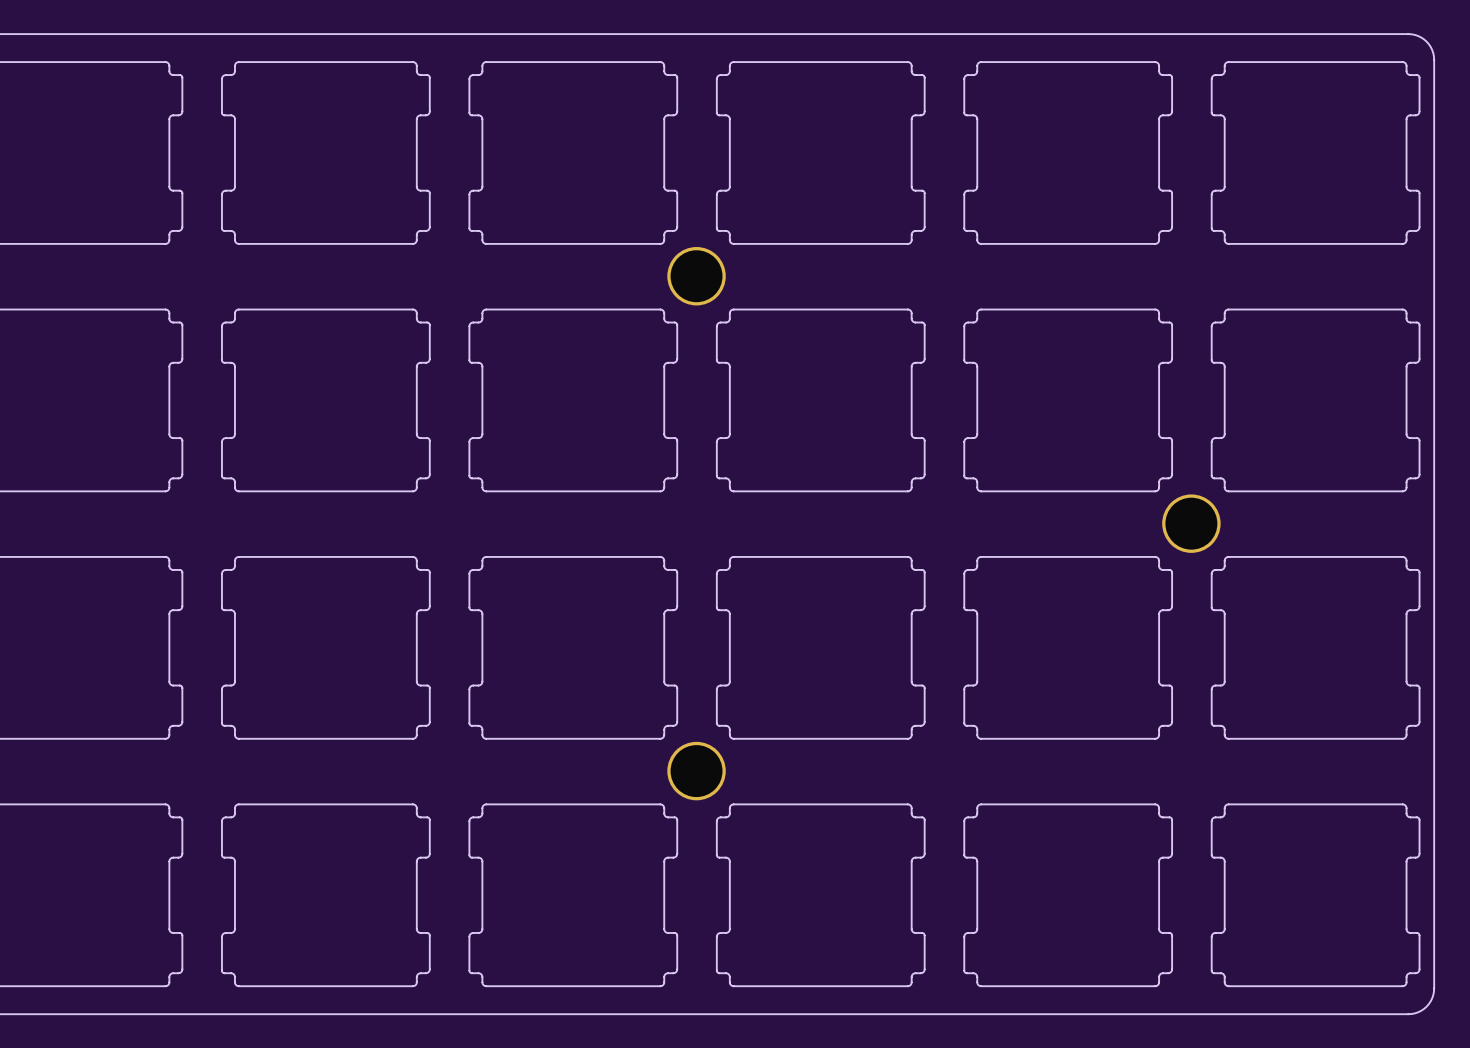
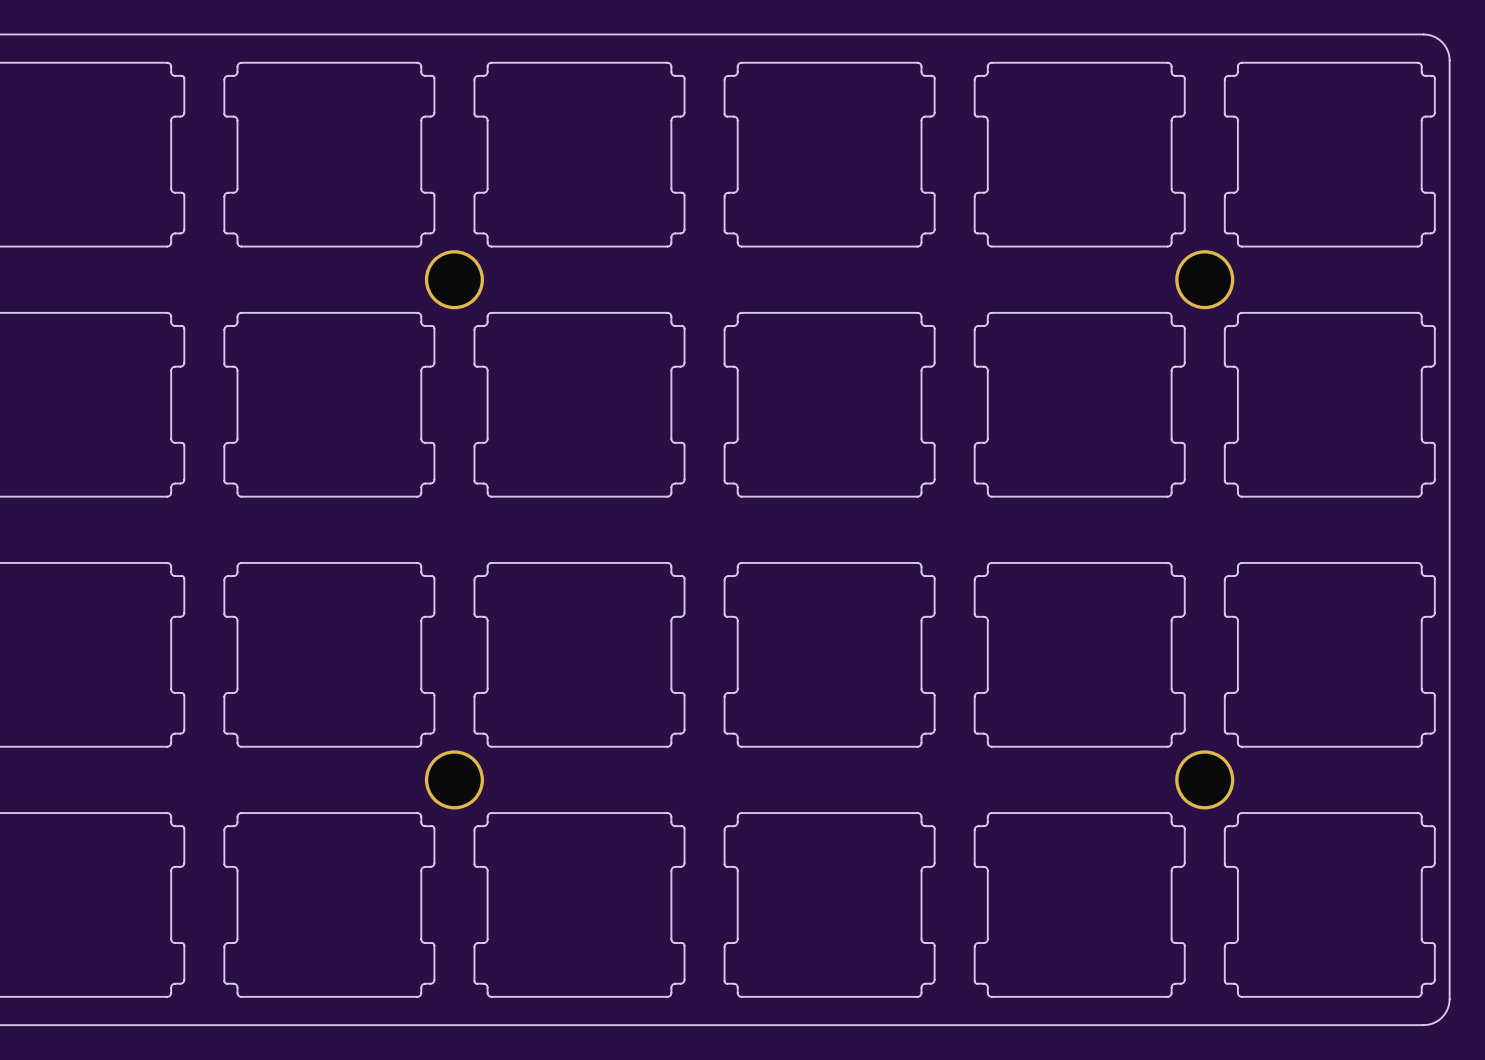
part position: (696, 276) -> (454, 279)
part: none -> (1204, 279)
part: (1191, 523) -> none
part position: (696, 771) -> (454, 779)
part: none -> (1204, 779)

